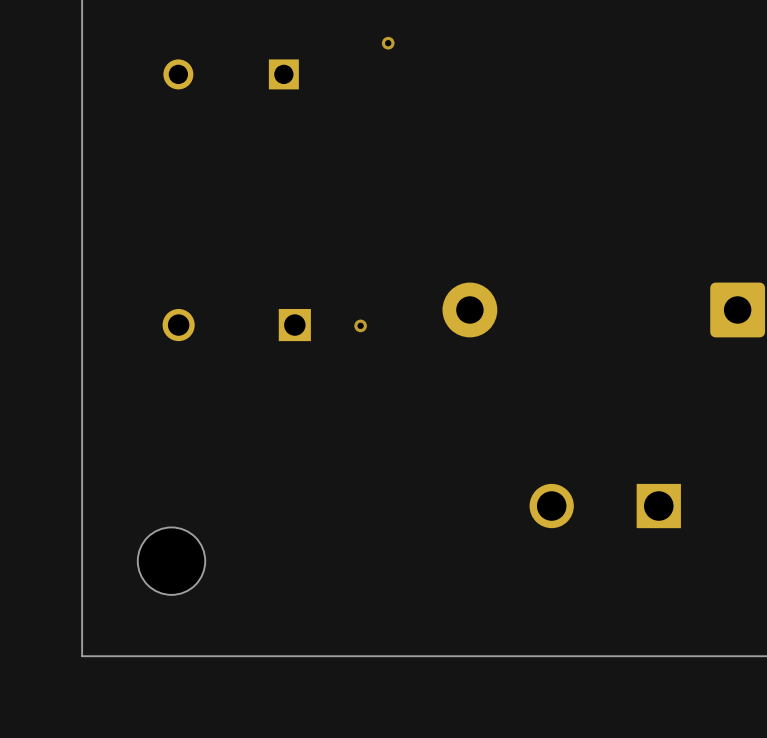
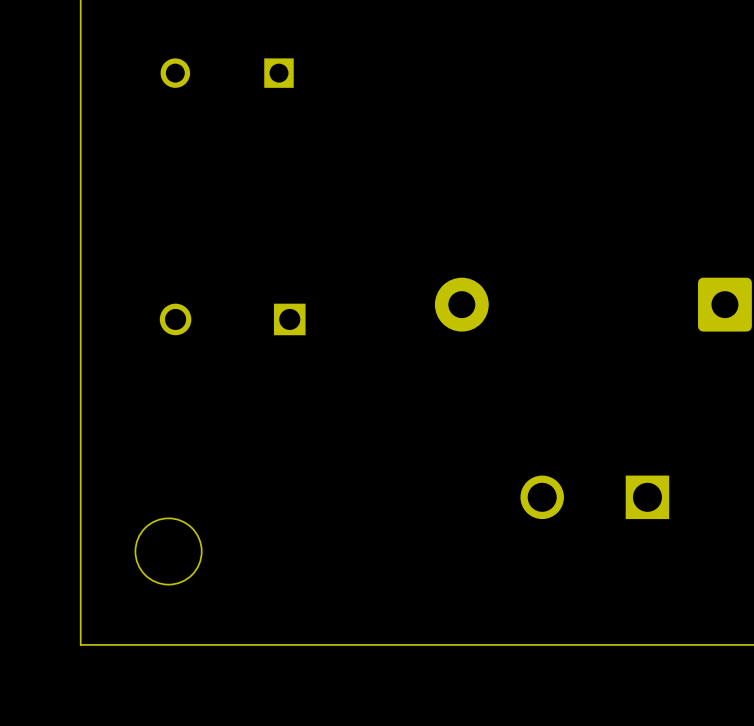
via: (388, 43) -> none
via: (360, 325) -> none

